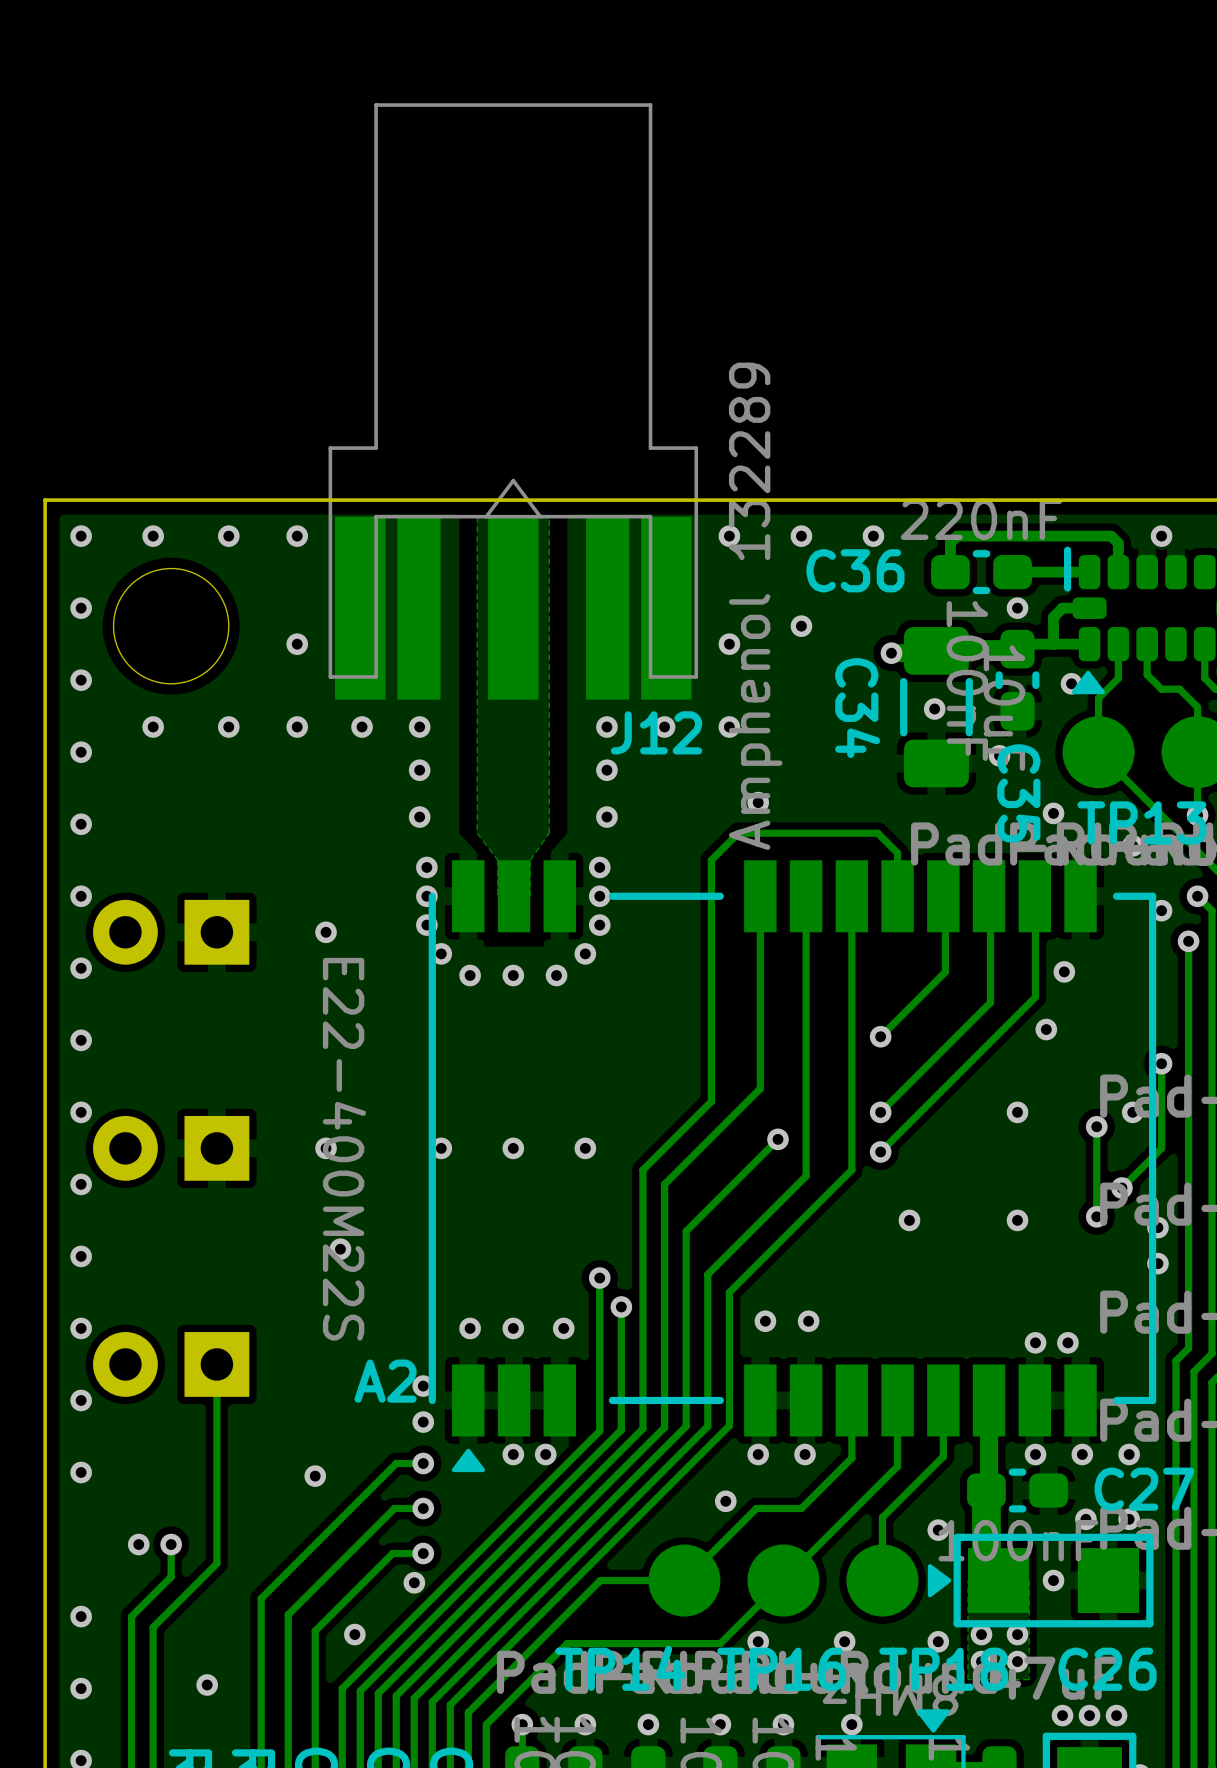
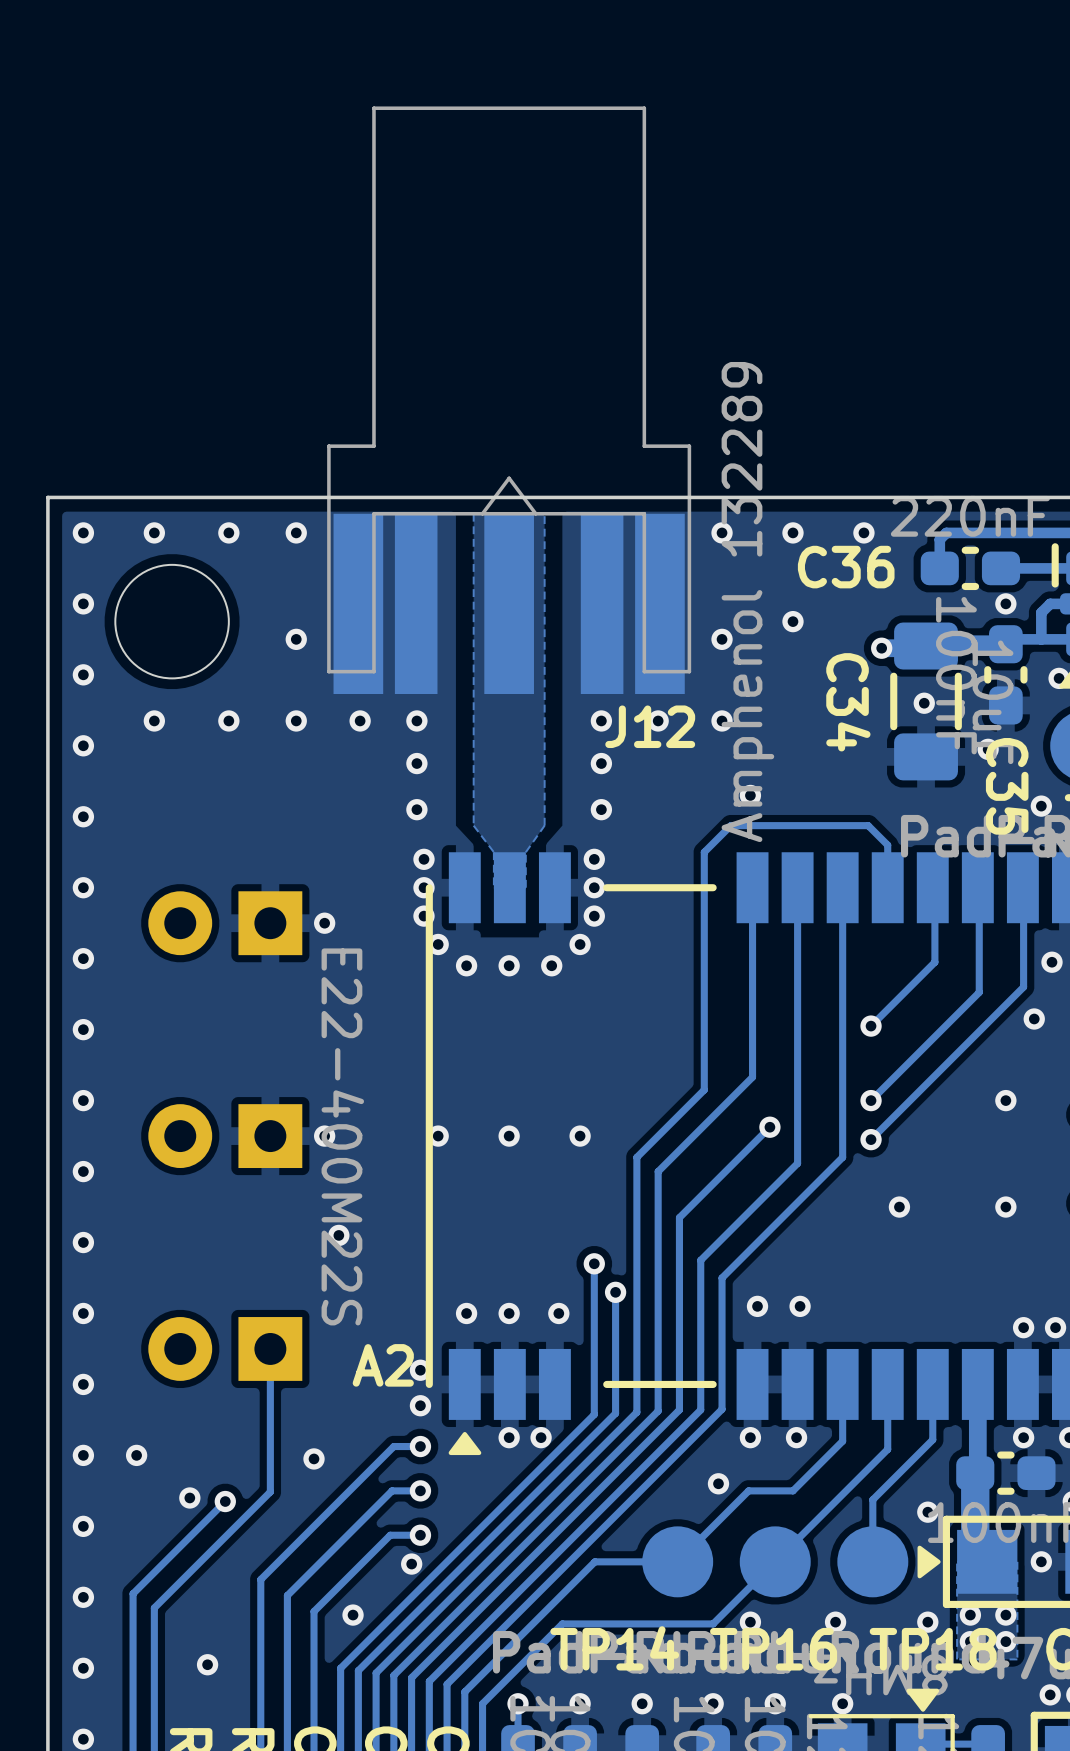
part position: (171, 932) -> (225, 923)
part position: (171, 1148) -> (225, 1136)
part position: (171, 1364) -> (225, 1348)
track: (216, 1364) (216, 1563) -> (270, 1348) (270, 1491) (217, 1545)
via: none -> (136, 1455)
via: none -> (189, 1497)
via: none -> (225, 1501)
via: none -> (83, 1526)
via: (138, 1544) -> none
track: (171, 1544) (171, 1576) (131, 1616) -> (225, 1501) (133, 1593) (133, 1597)
via: (171, 1544) -> none

